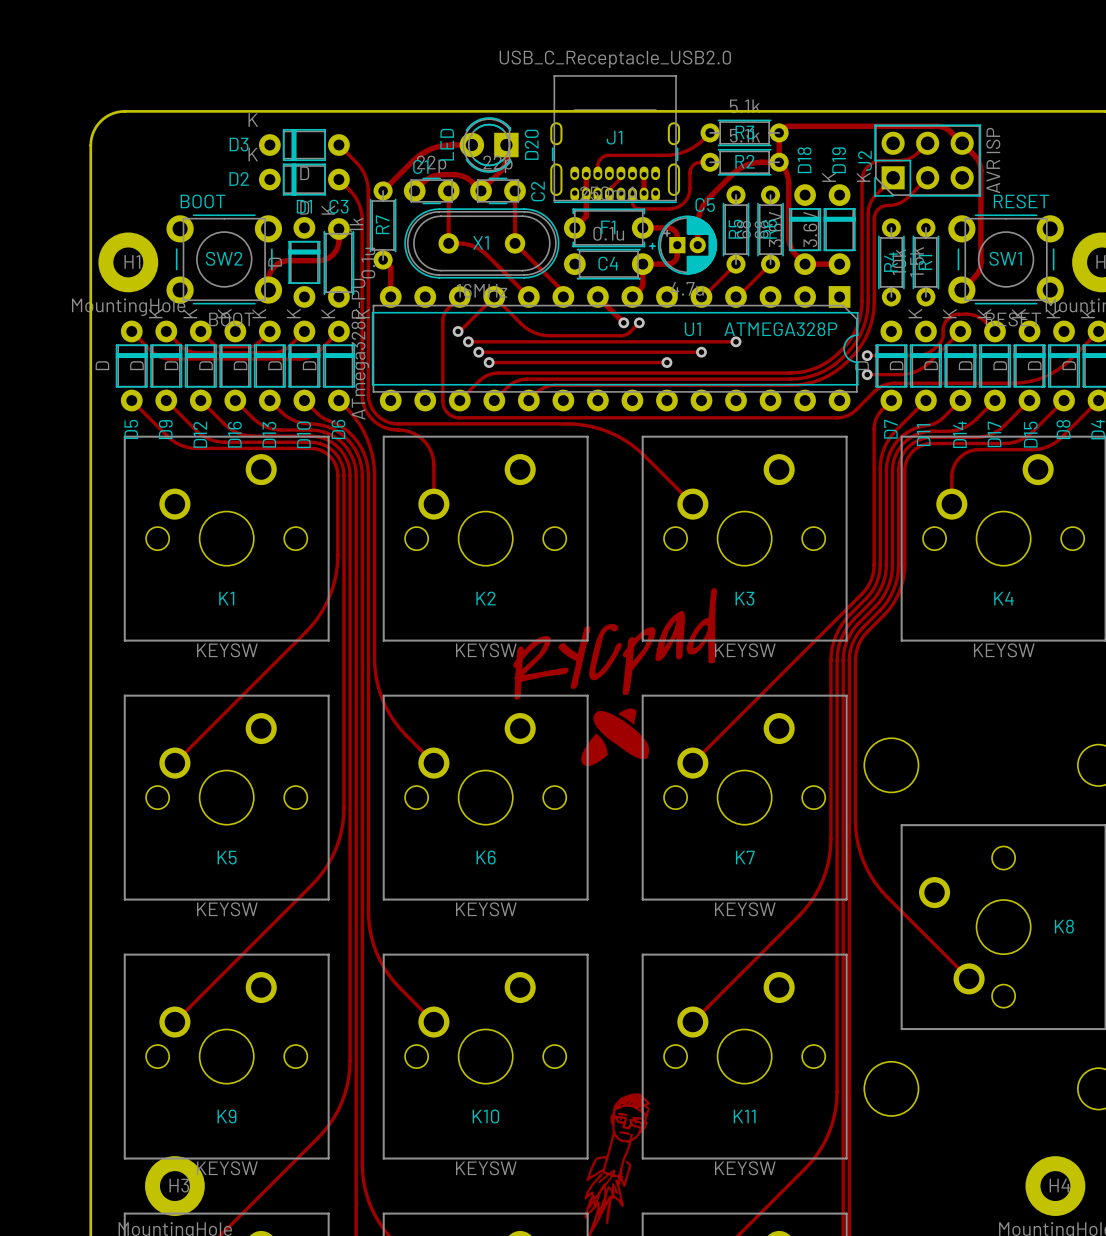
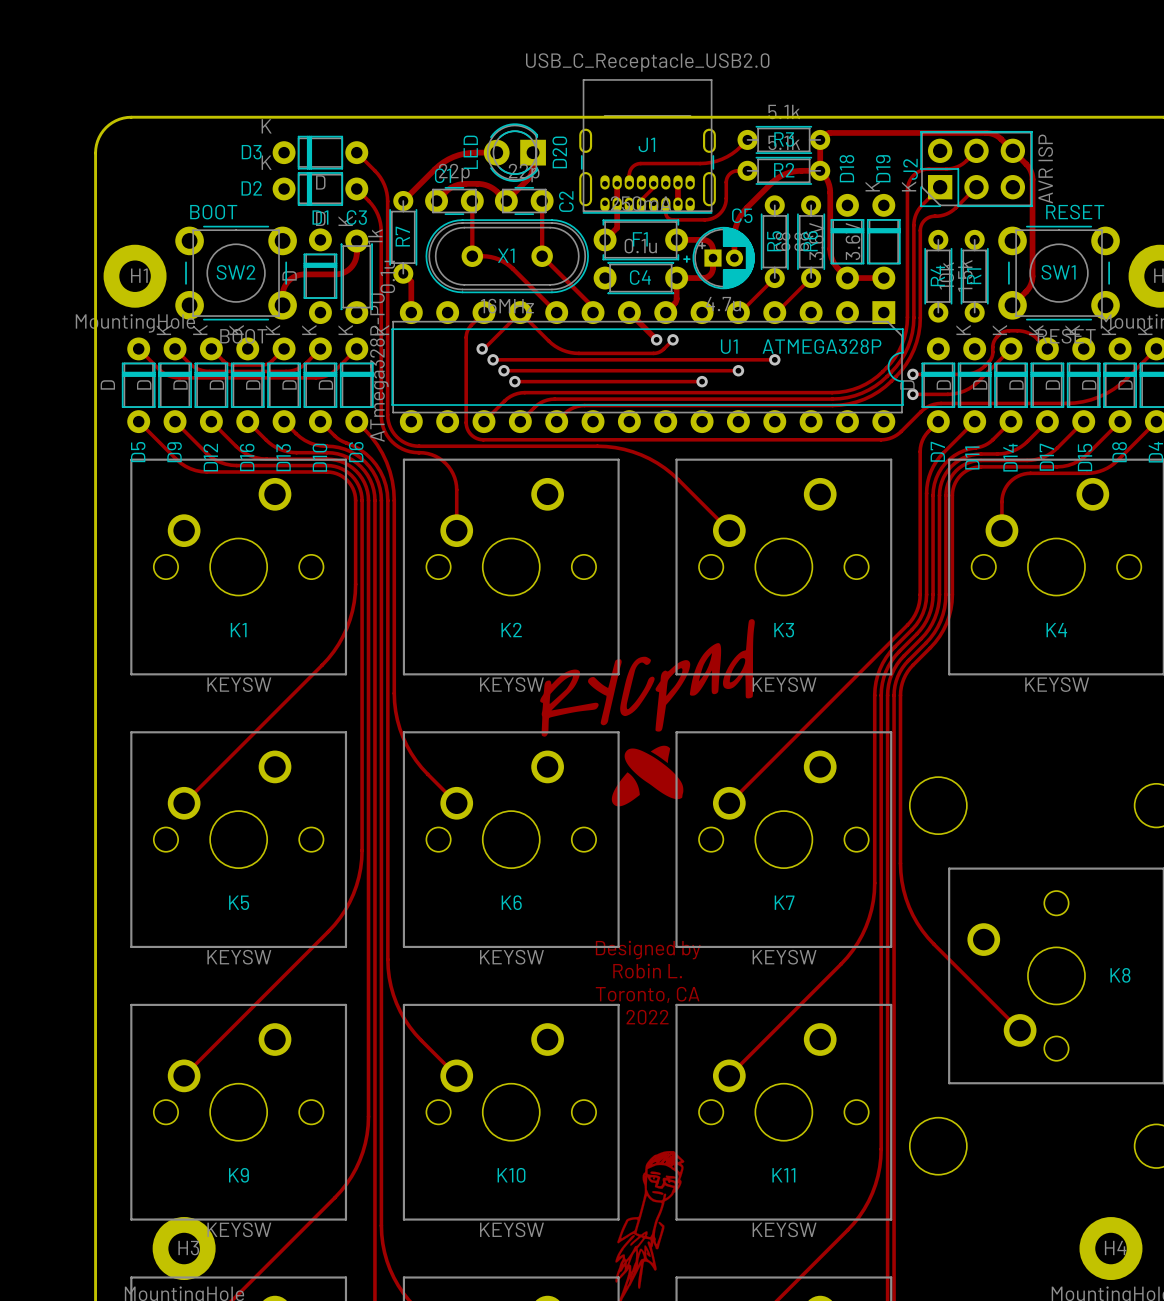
text: none -> Designed by (648, 950)
text: none -> Robin L. (647, 971)
text: none -> Toronto, CA (647, 994)
text: none -> 2022 (647, 1017)

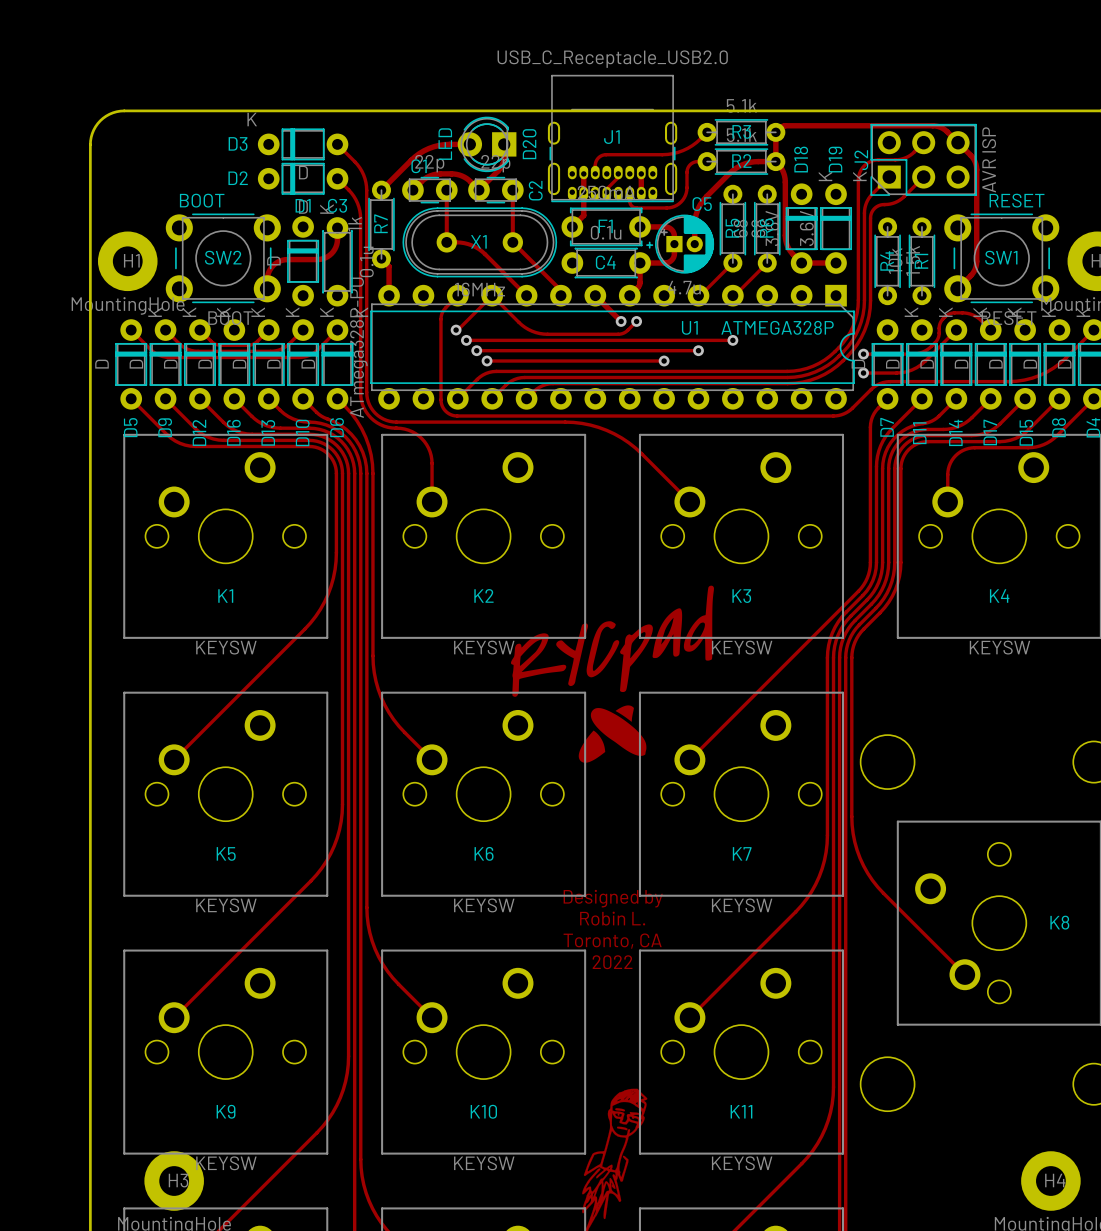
D2 text: K (266, 162) -> none

